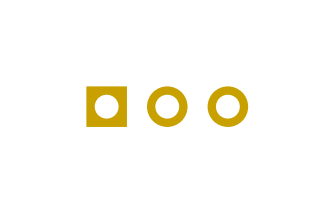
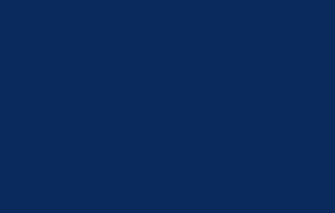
part: (167, 106) -> none

